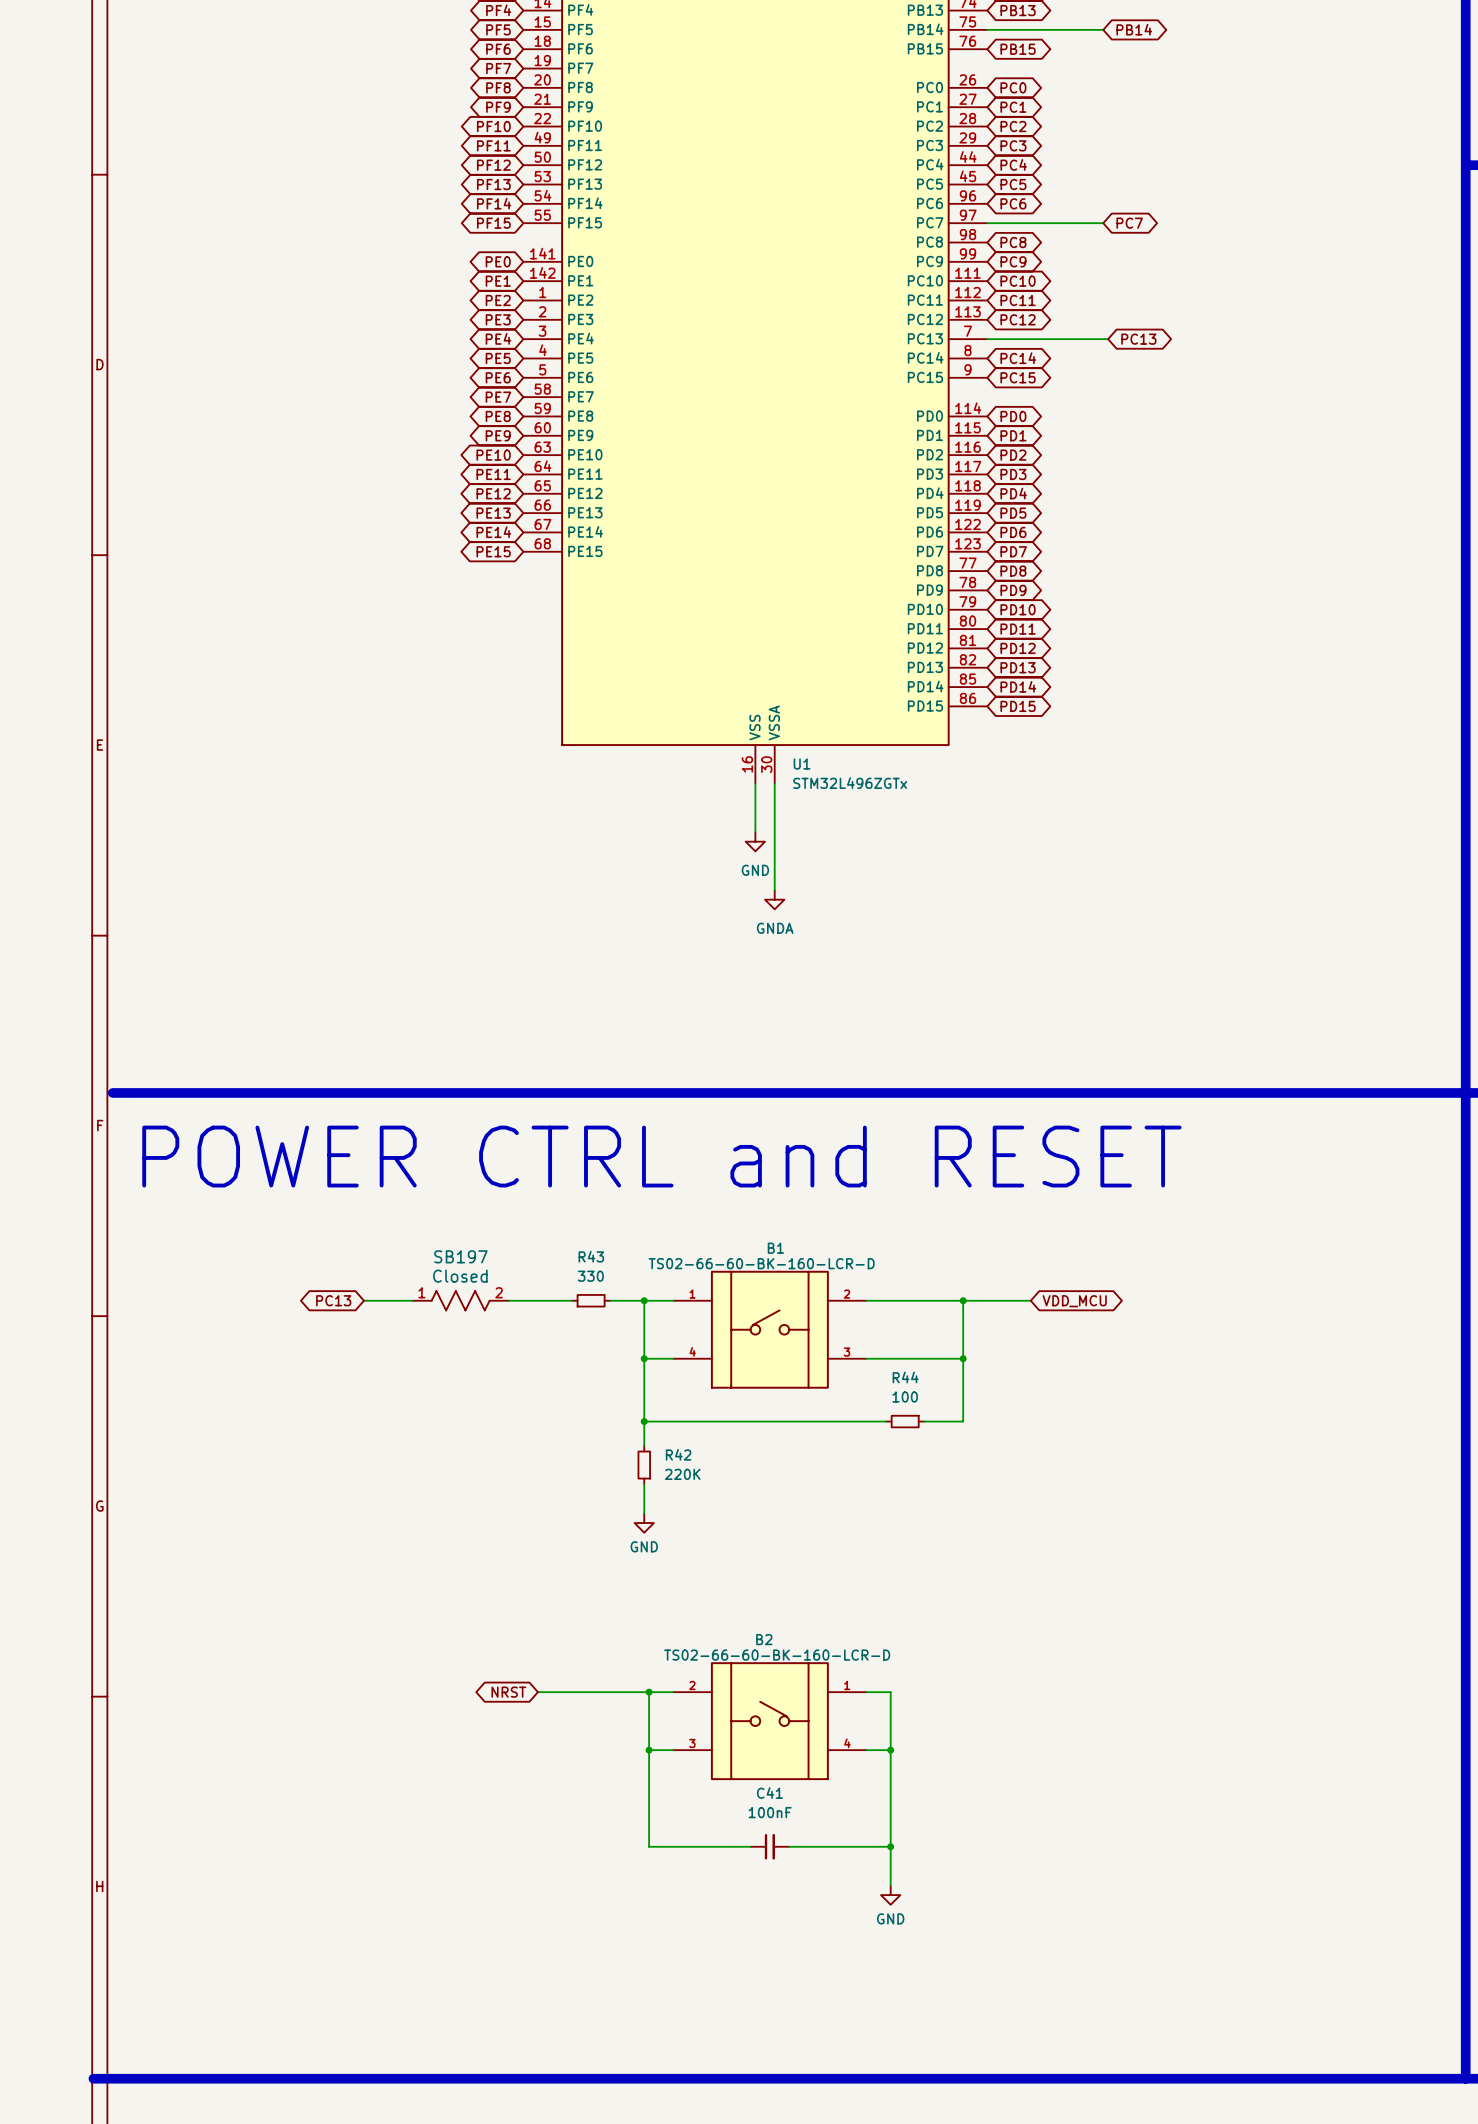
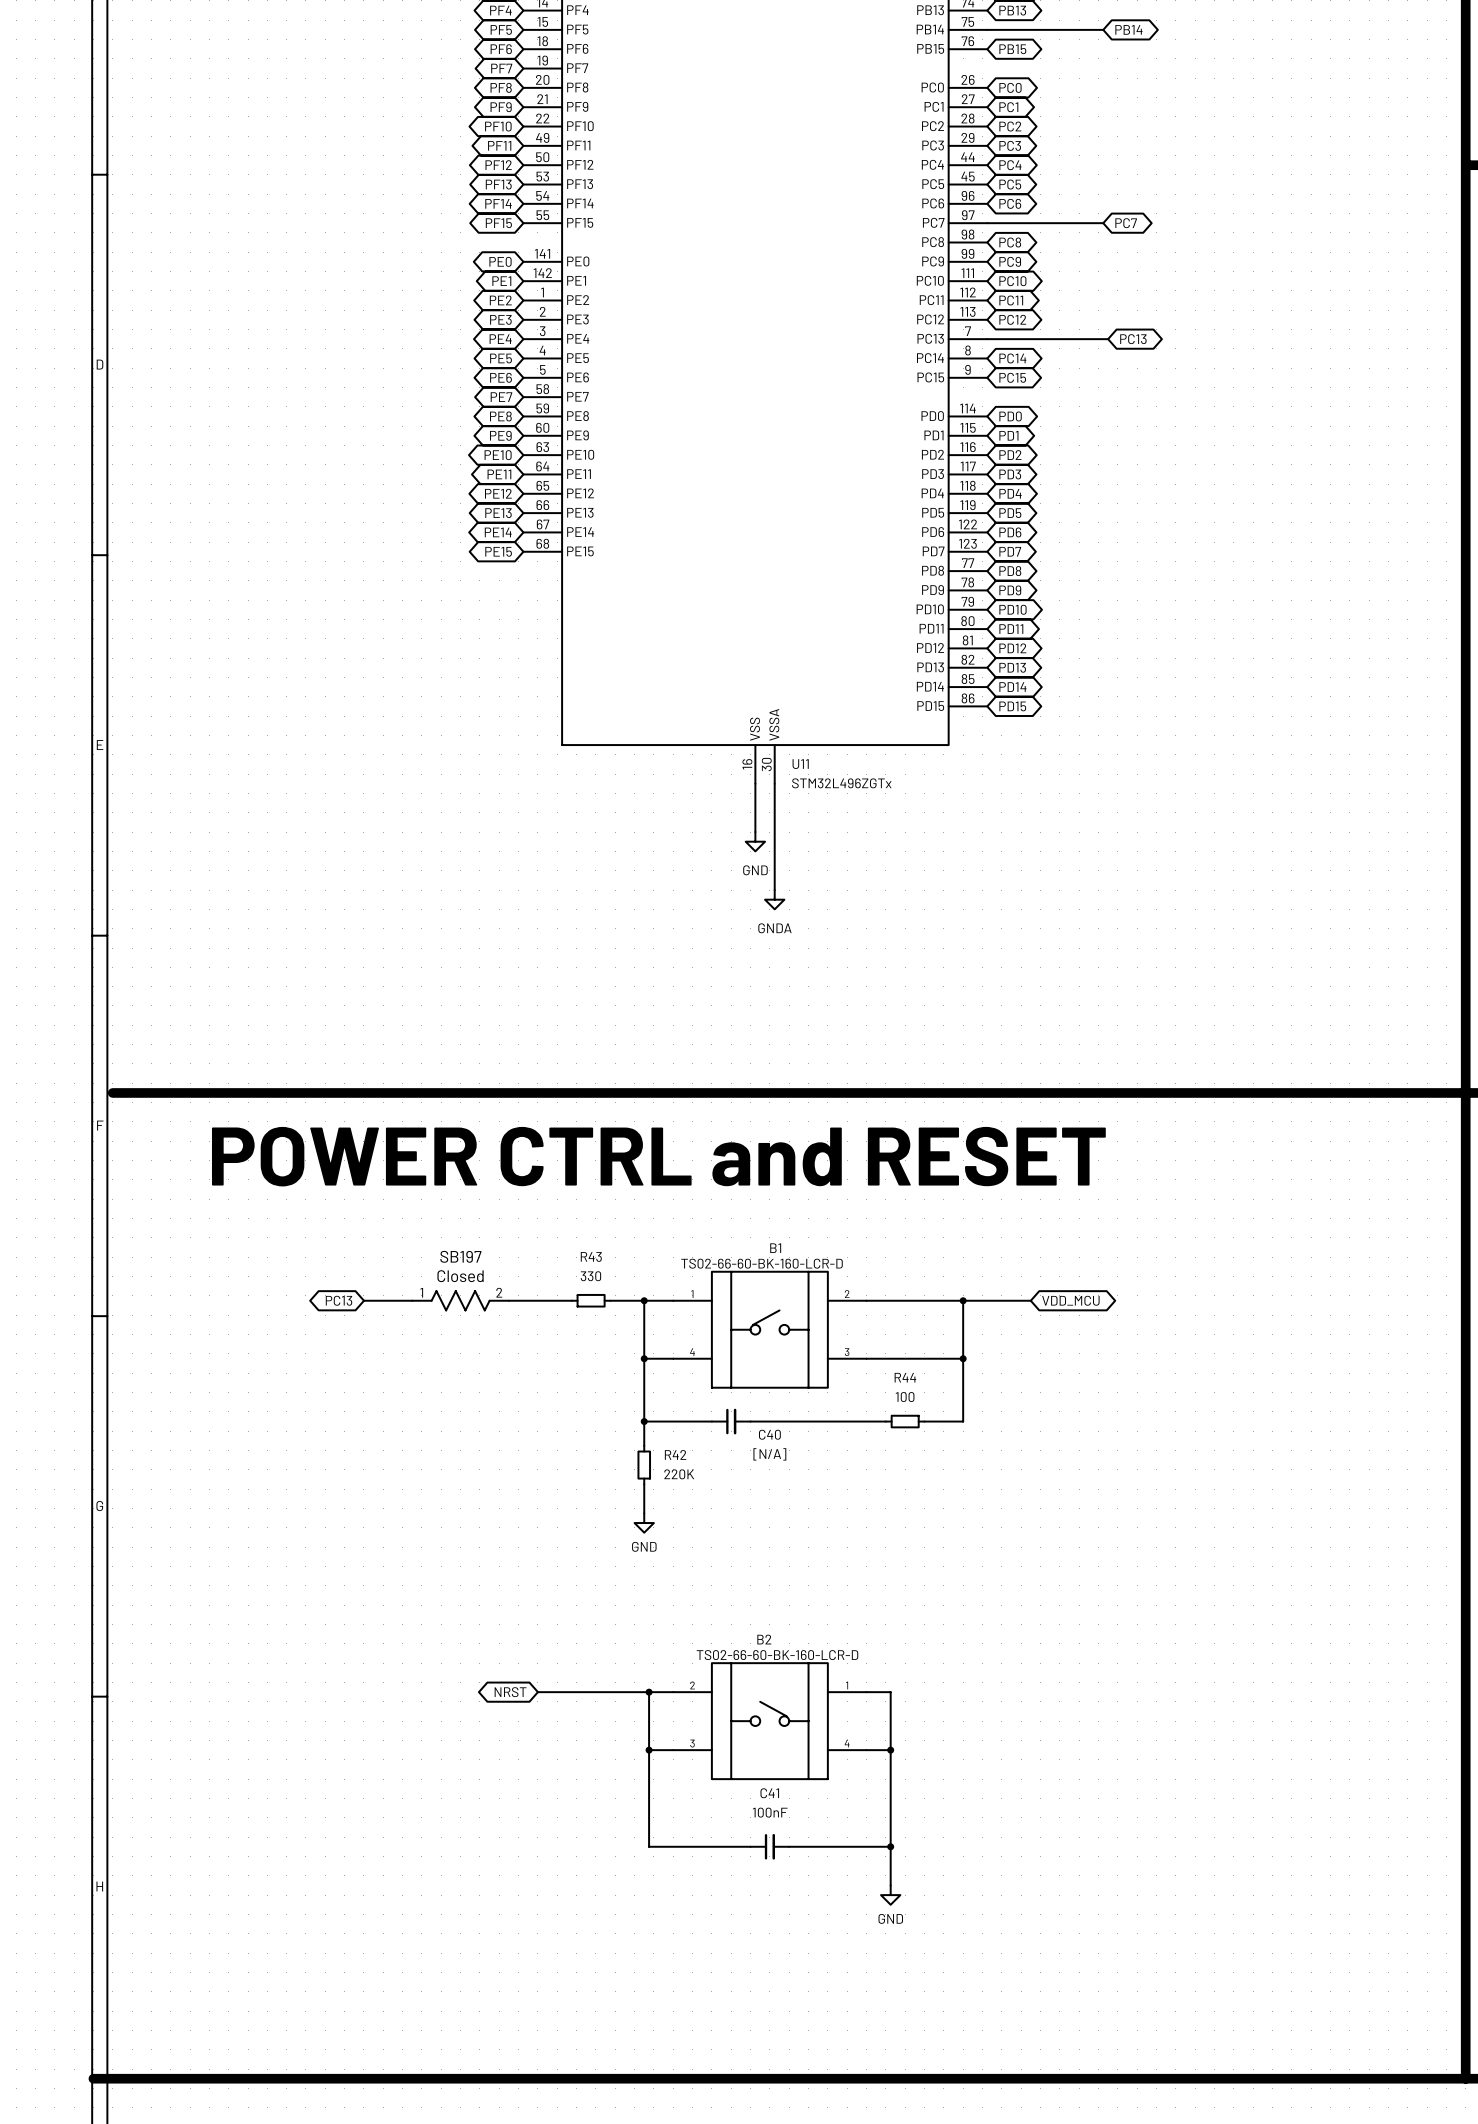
U1 name: U1 (802, 764) -> U11 (800, 764)
C40: none -> [N/A] (731, 1421)

